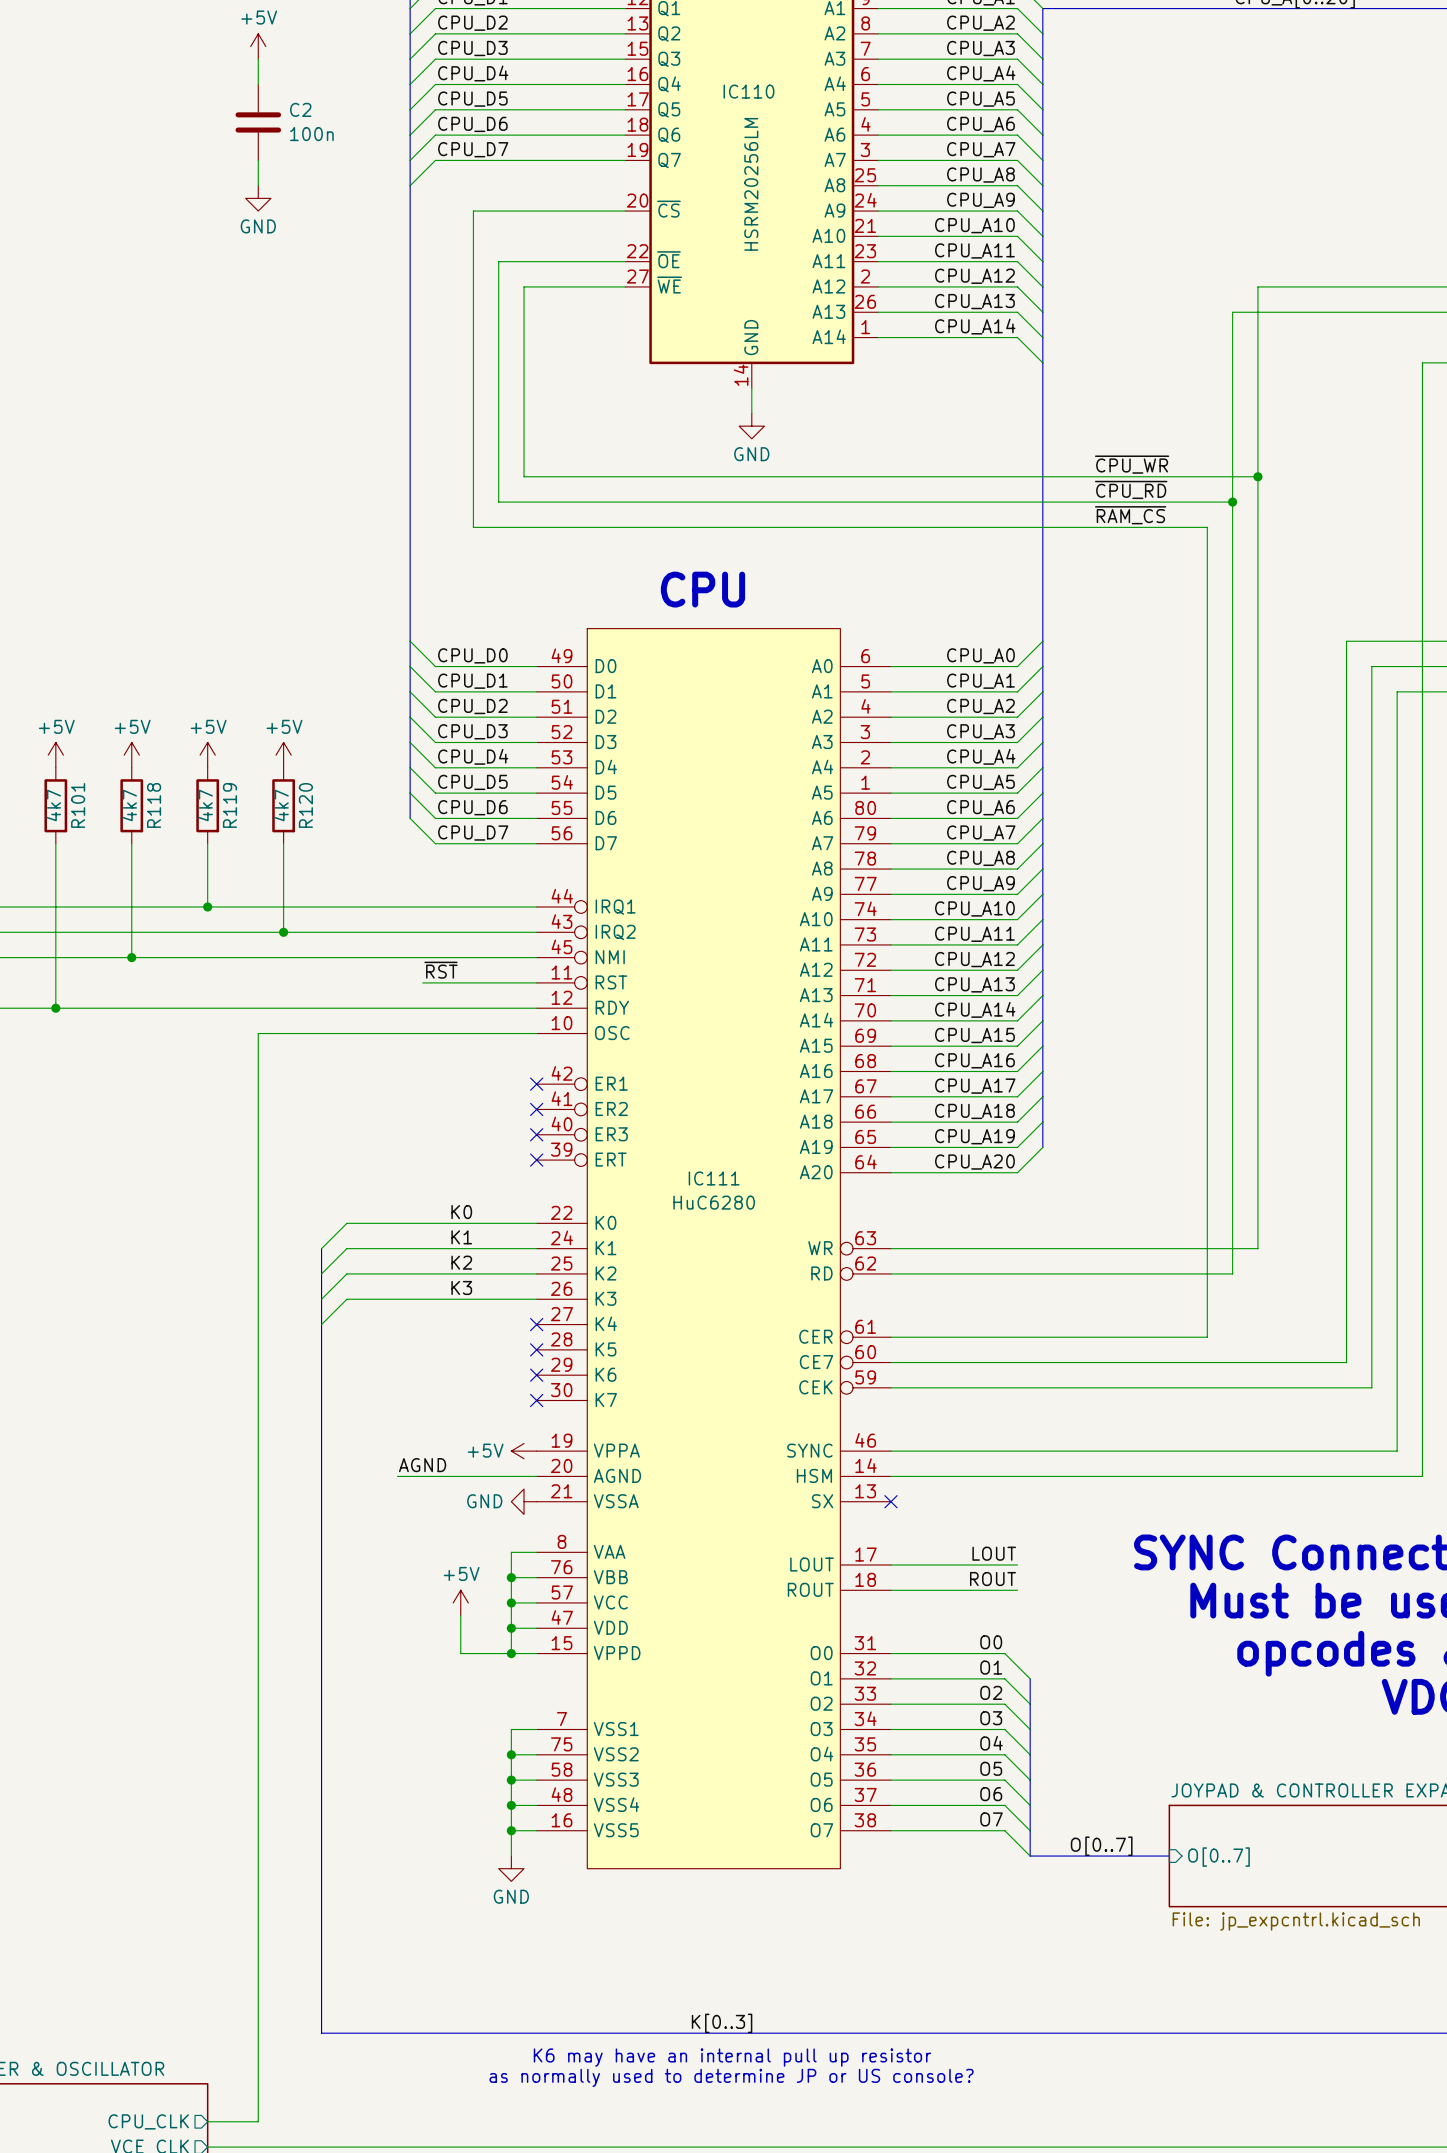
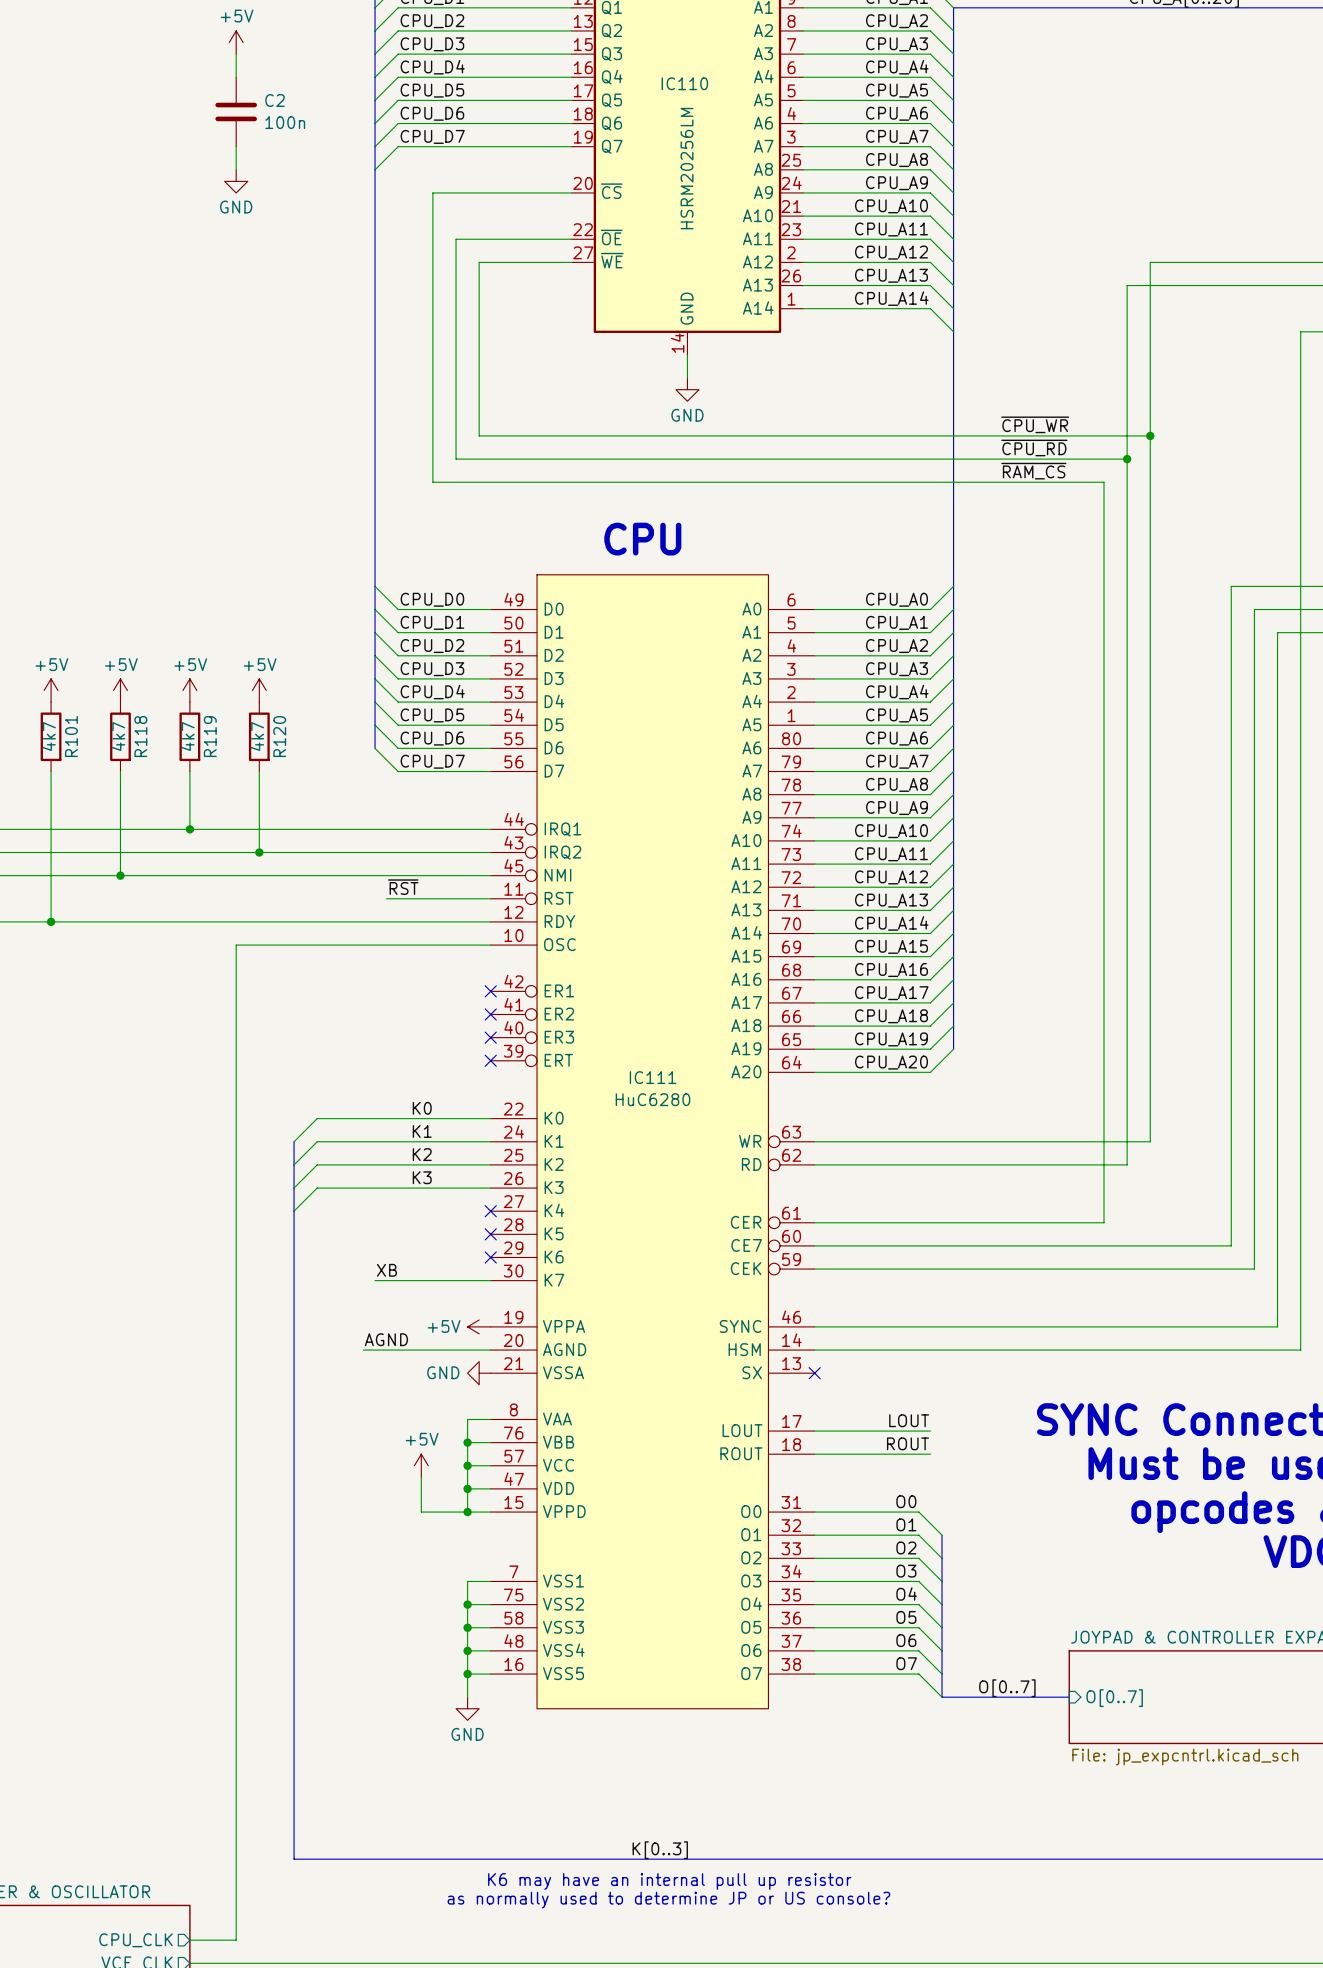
label: none -> XB (386, 1270)
wire: none -> (375, 1280) (490, 1280)
no-connect mark: (536, 1400) -> none

